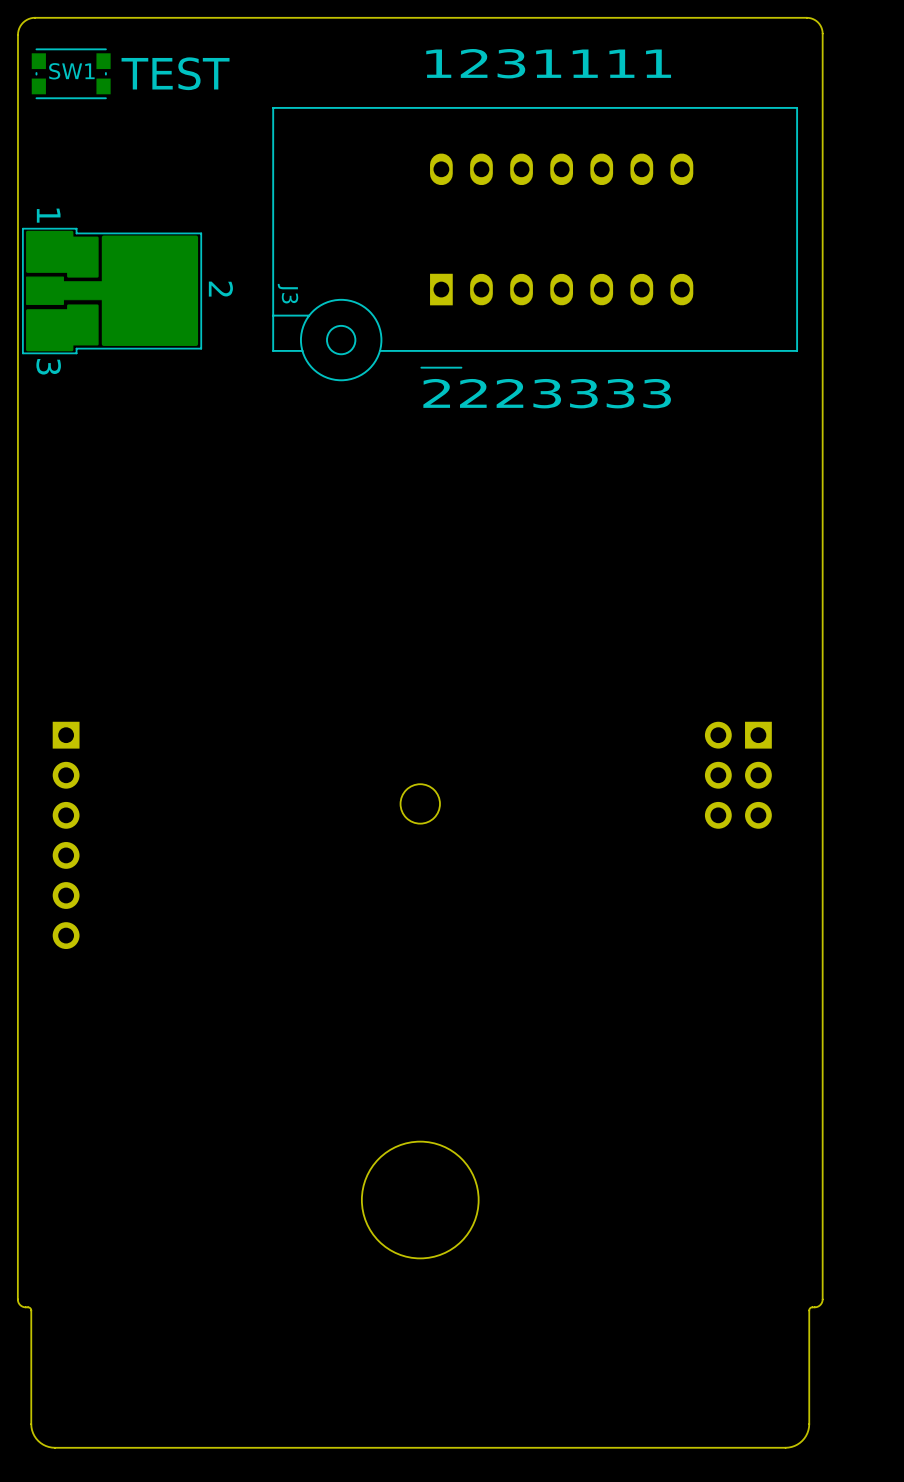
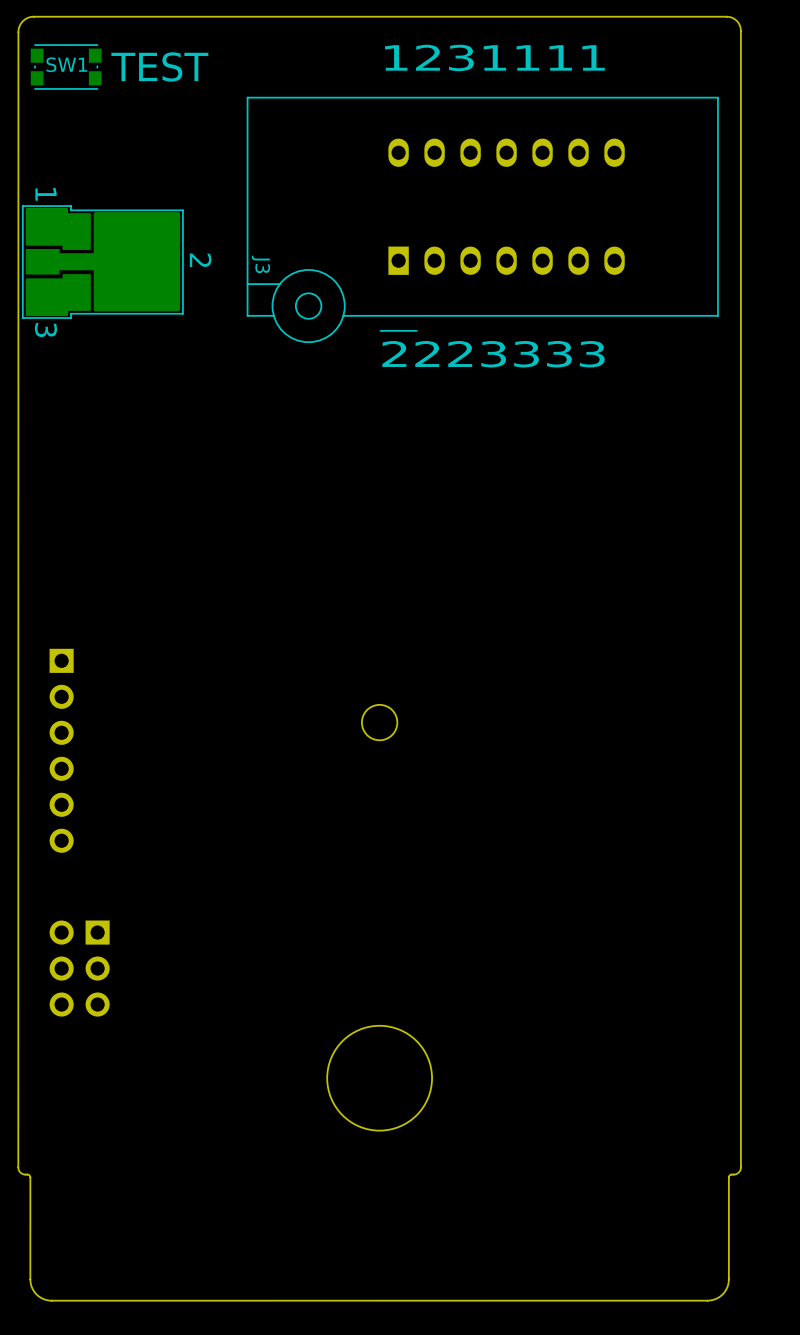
part: (738, 775) -> none
part: none -> (79, 968)

